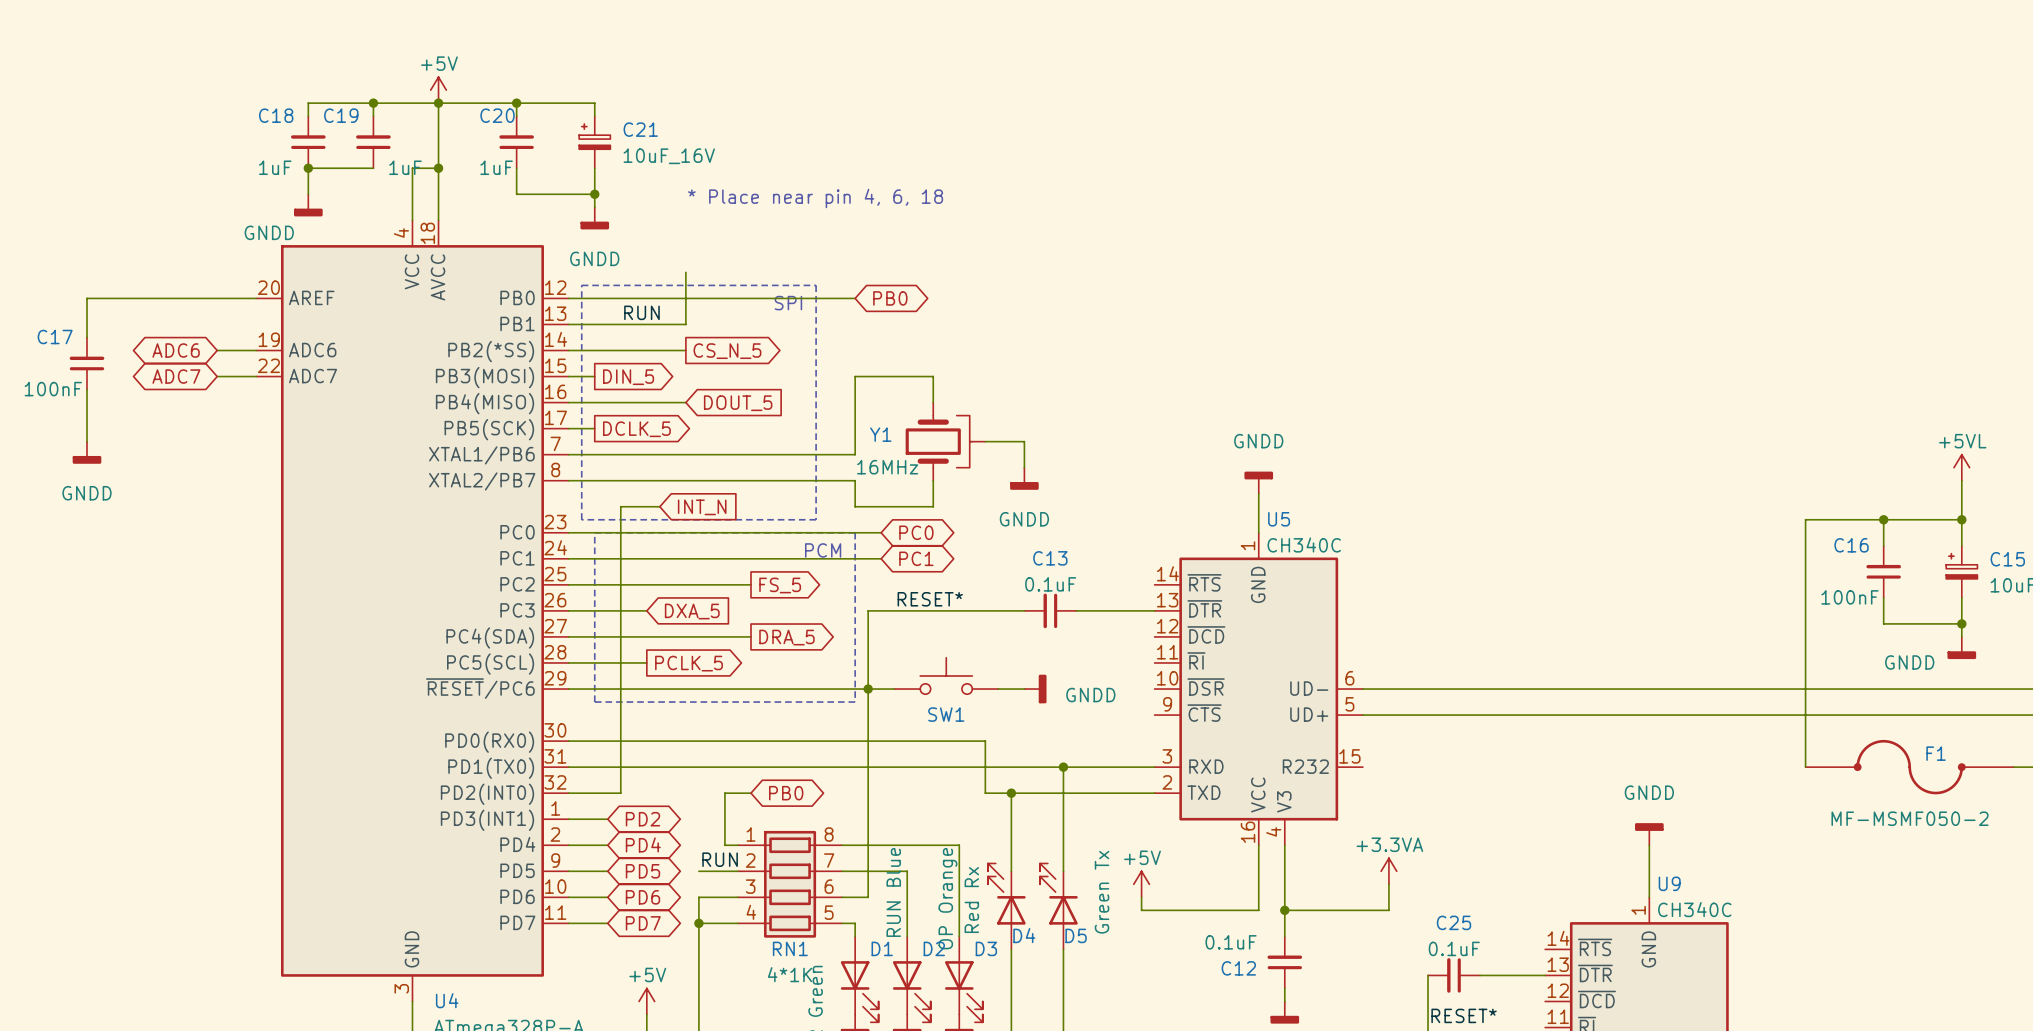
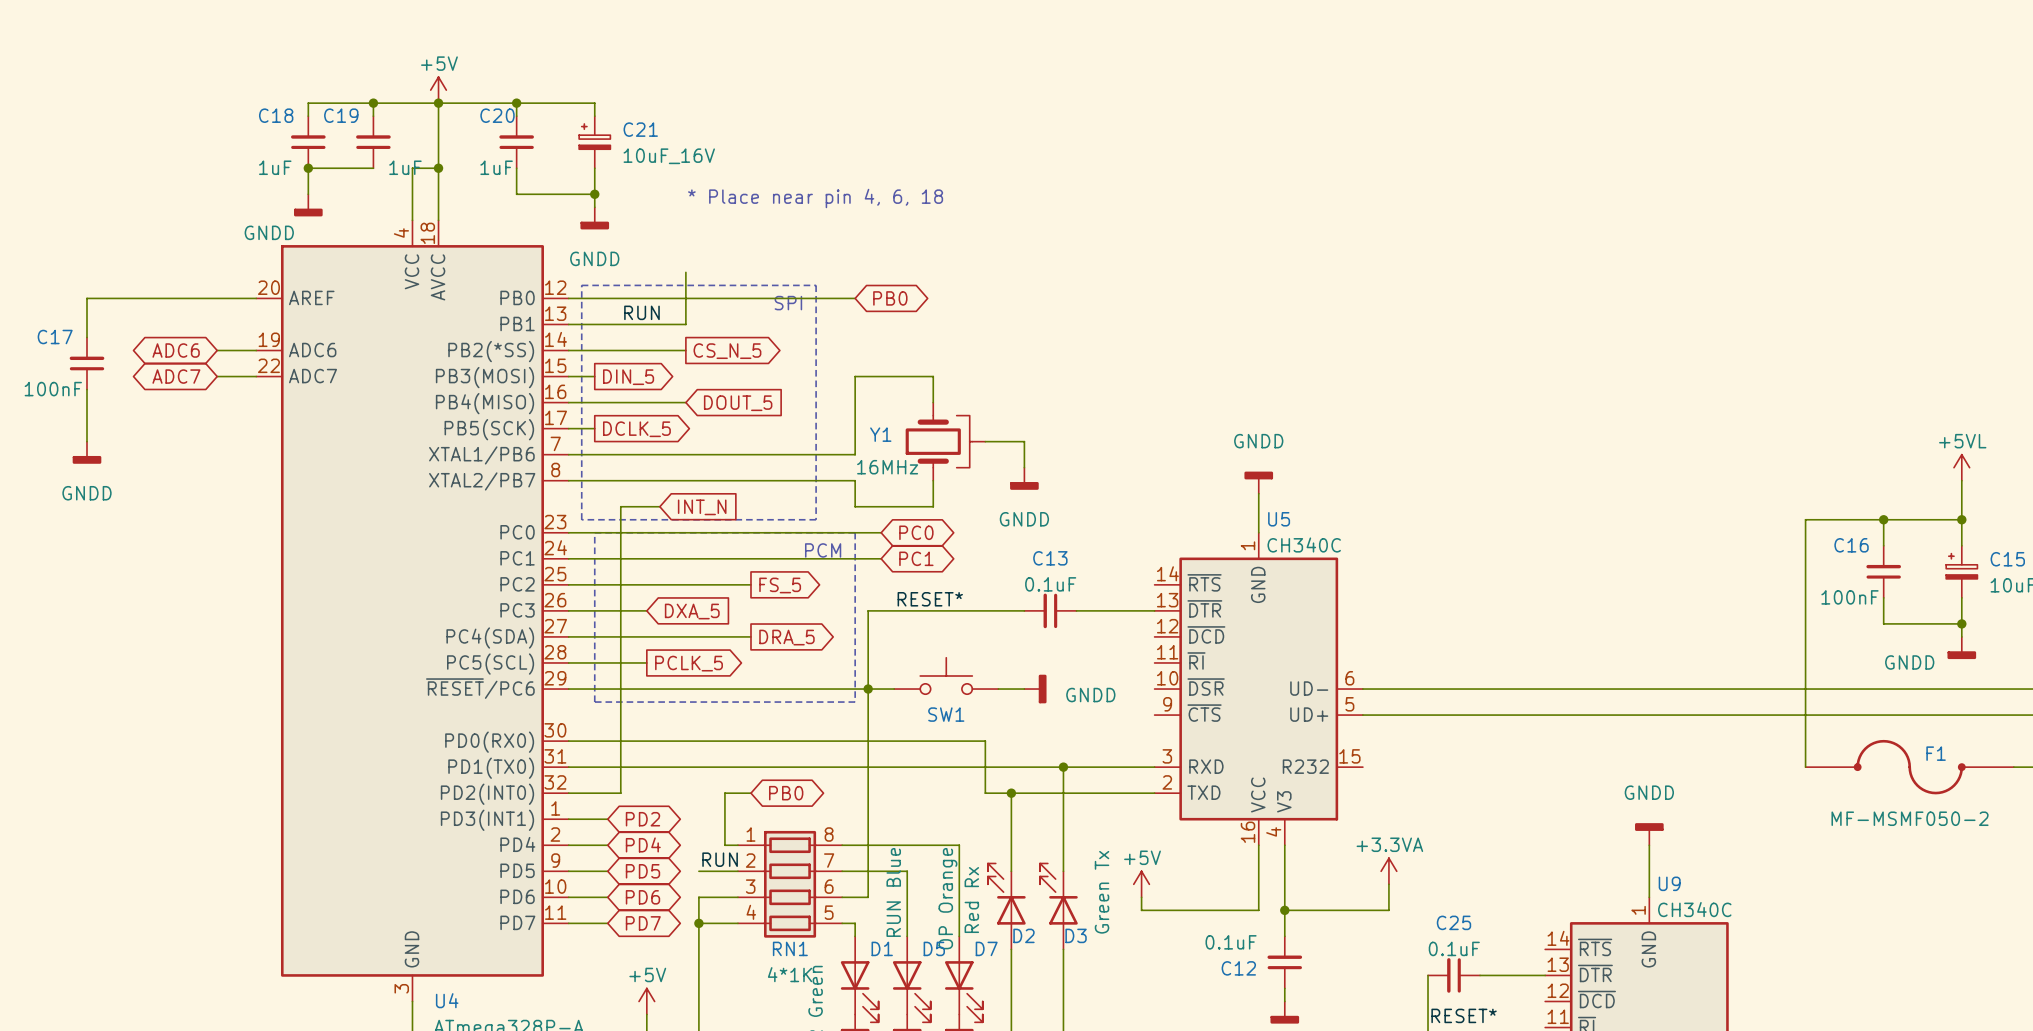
D4 name: D4 (1024, 935) -> D2 (1023, 935)
D5 name: D5 (1076, 935) -> D3 (1076, 935)
D2 name: D2 (934, 948) -> D5 (934, 948)
D3 name: D3 (986, 948) -> D7 (986, 948)

